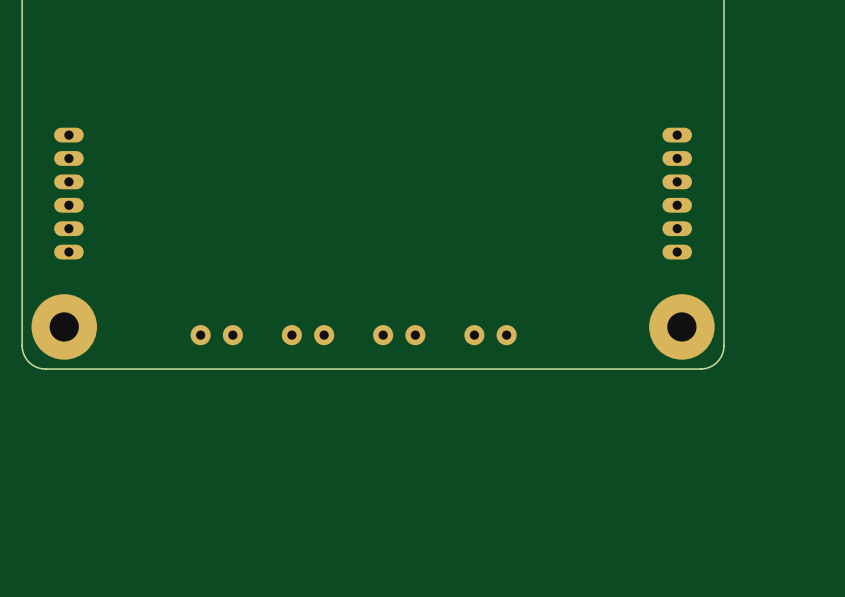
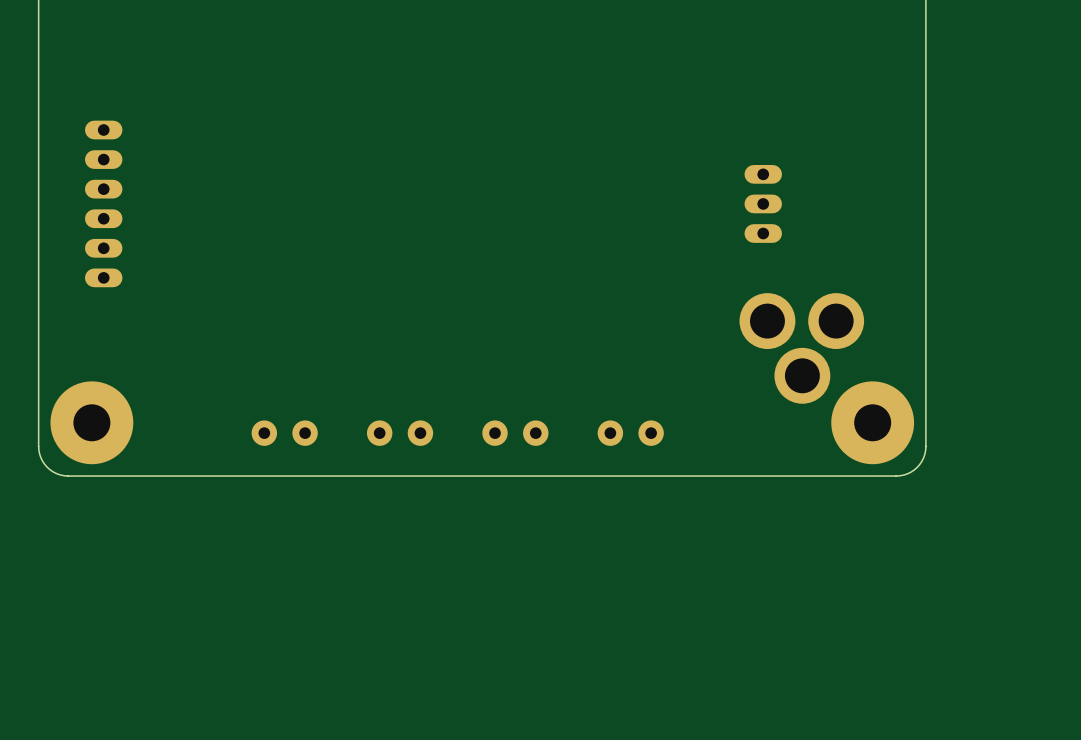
part: none -> (763, 203)
part position: (68, 193) -> (103, 203)
part: (677, 193) -> none
part: none -> (801, 348)

